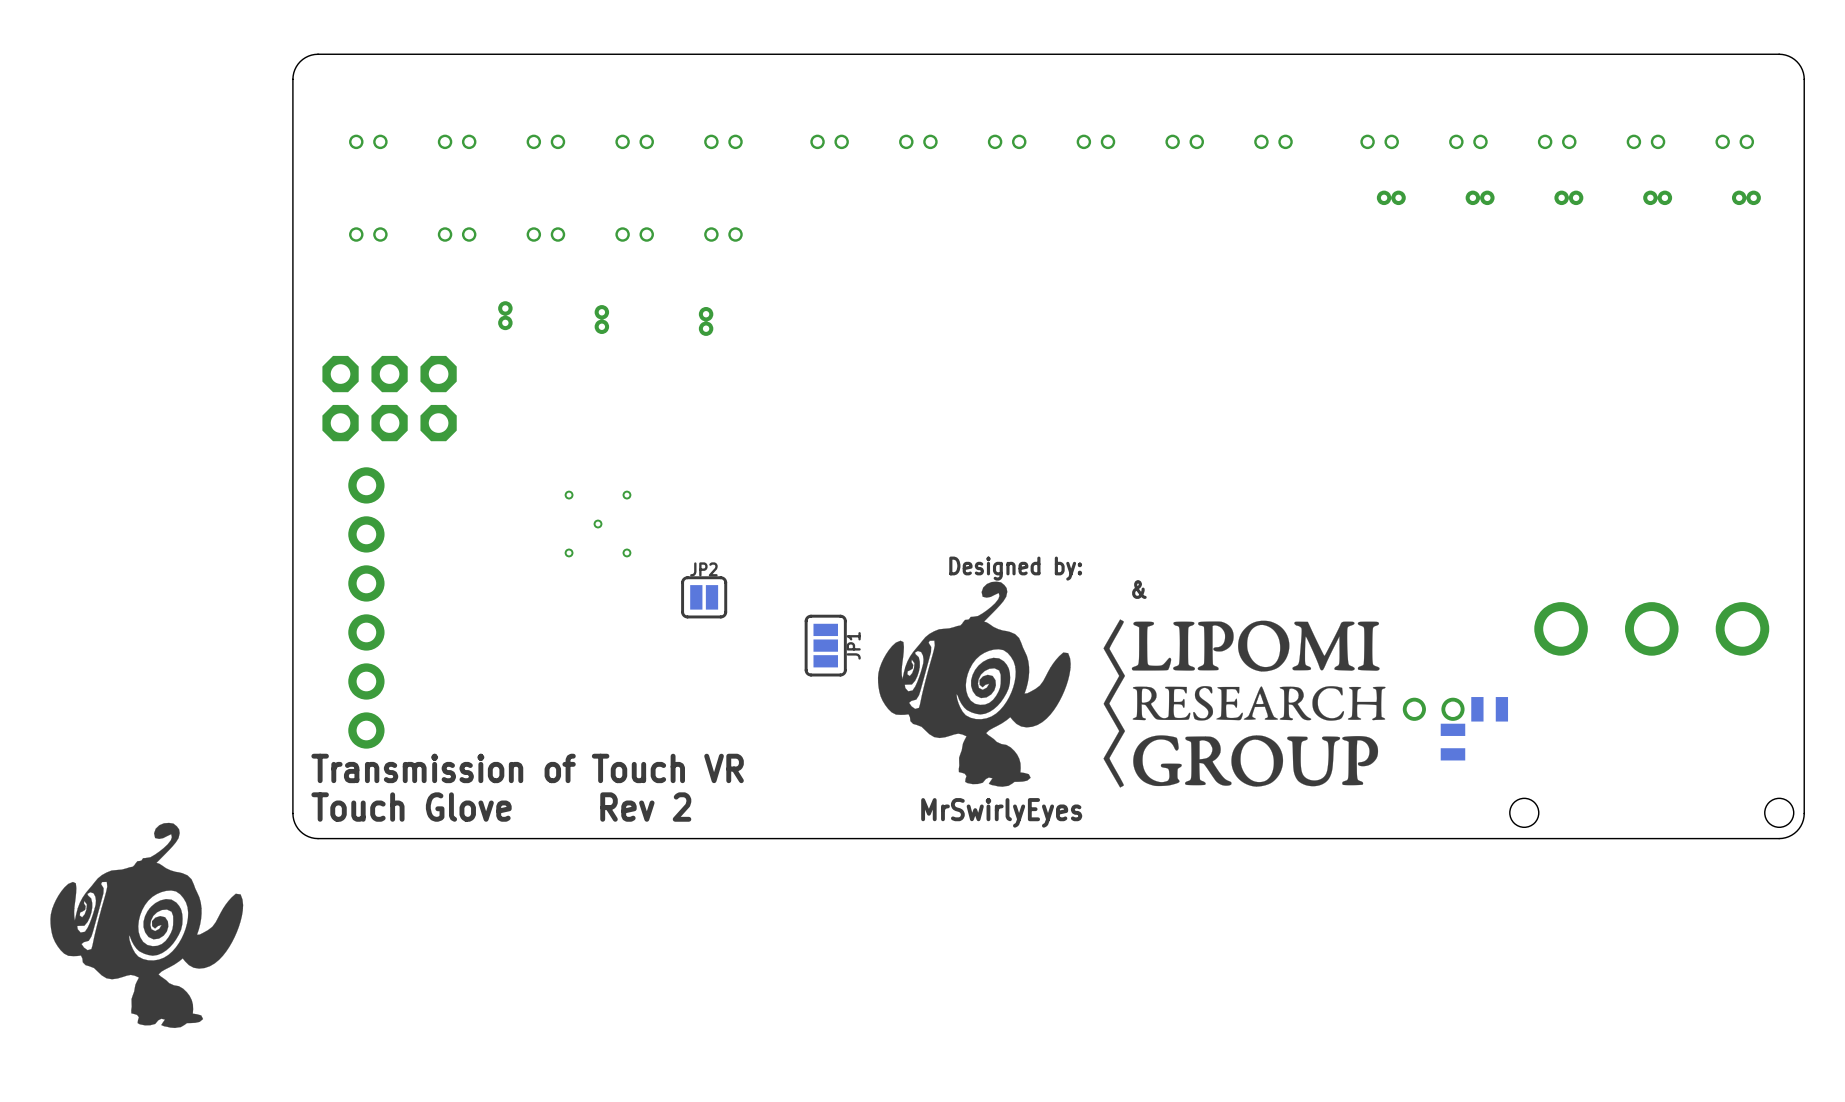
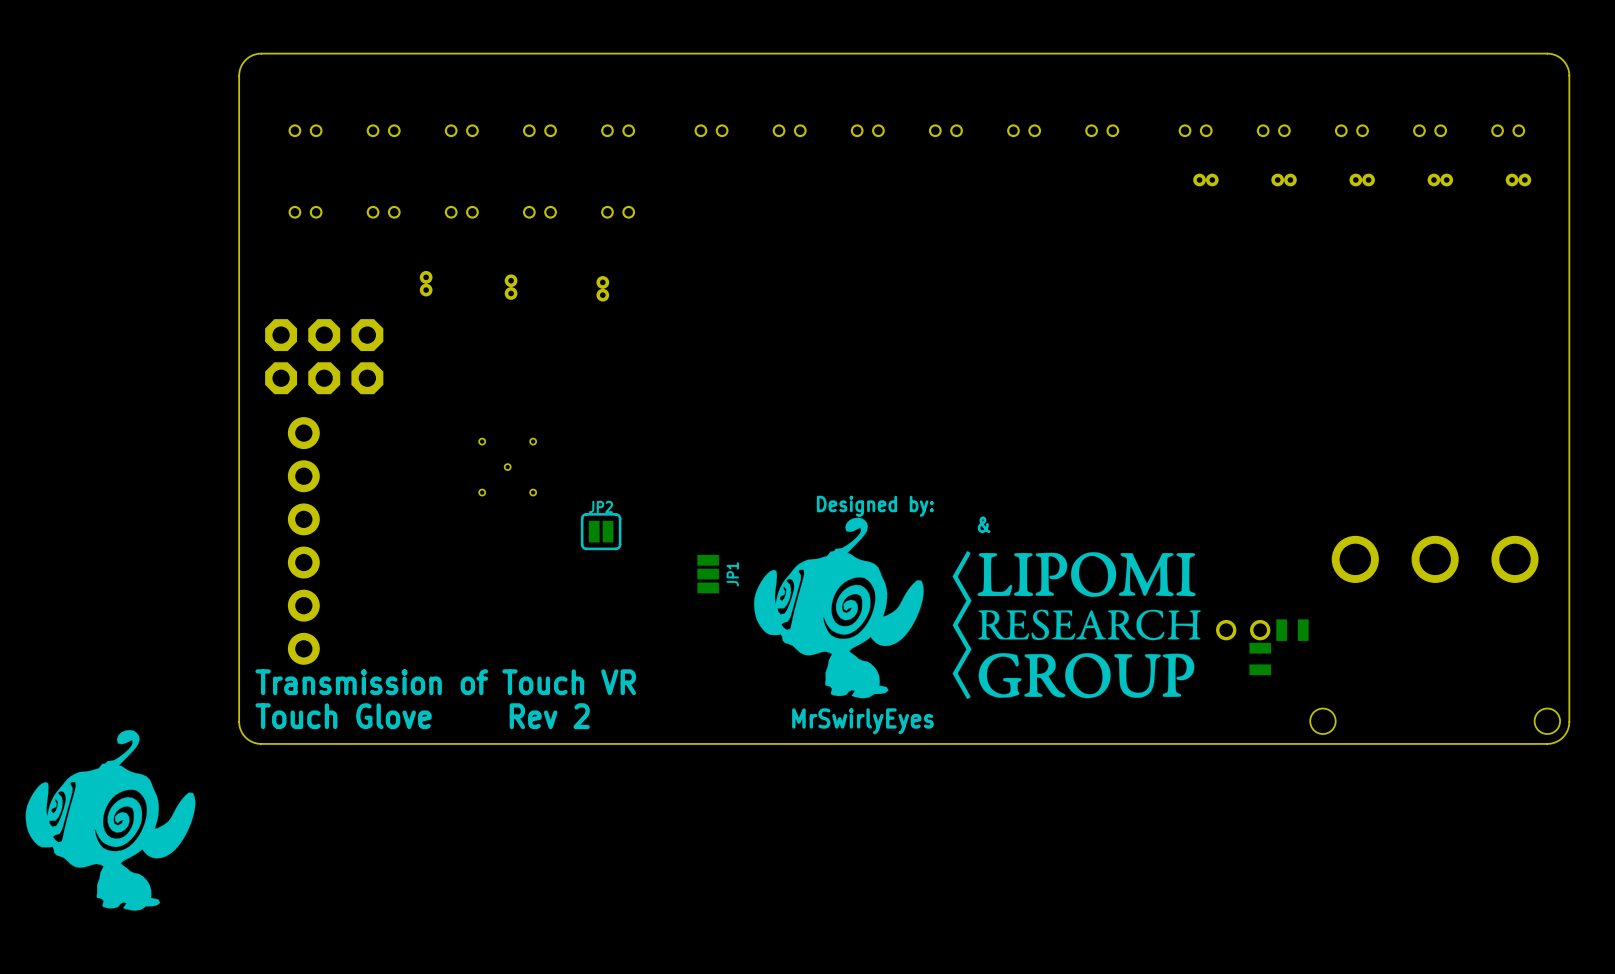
JP1 footprint: [804, 614, 847, 677] -> [697, 554, 719, 594]

